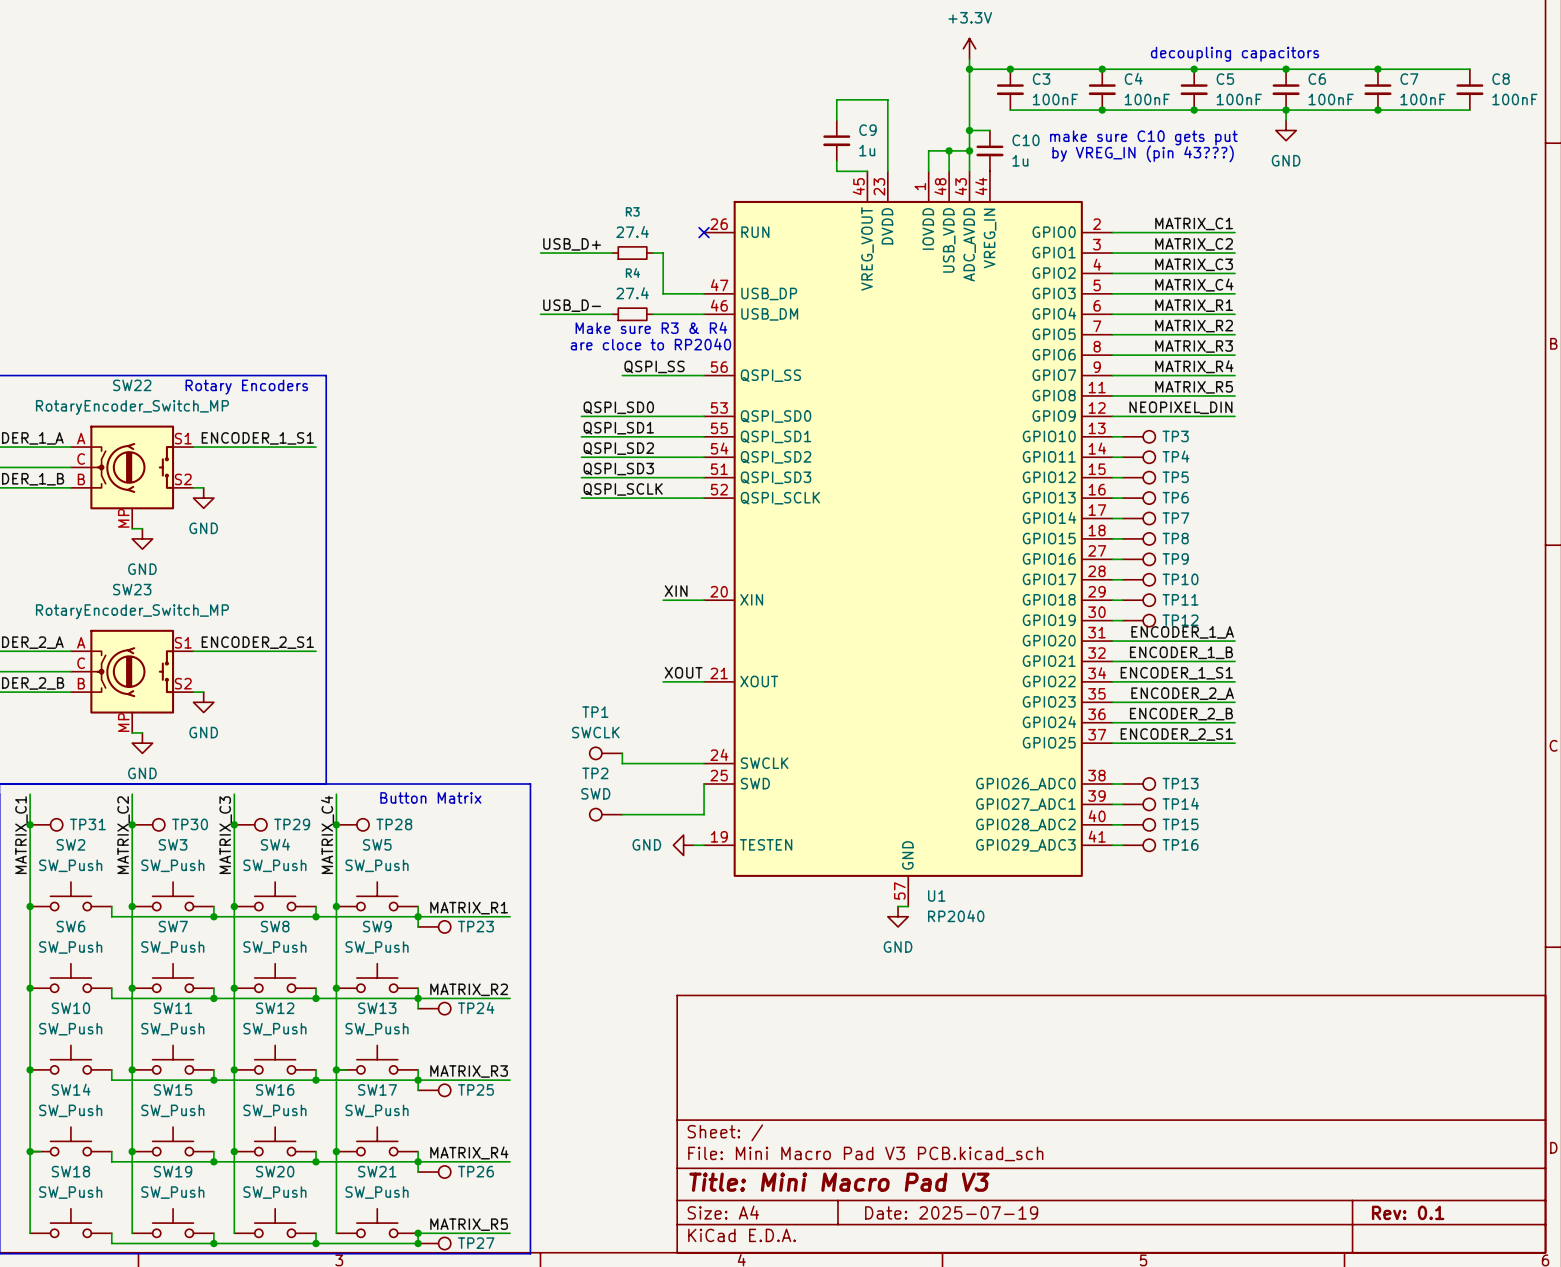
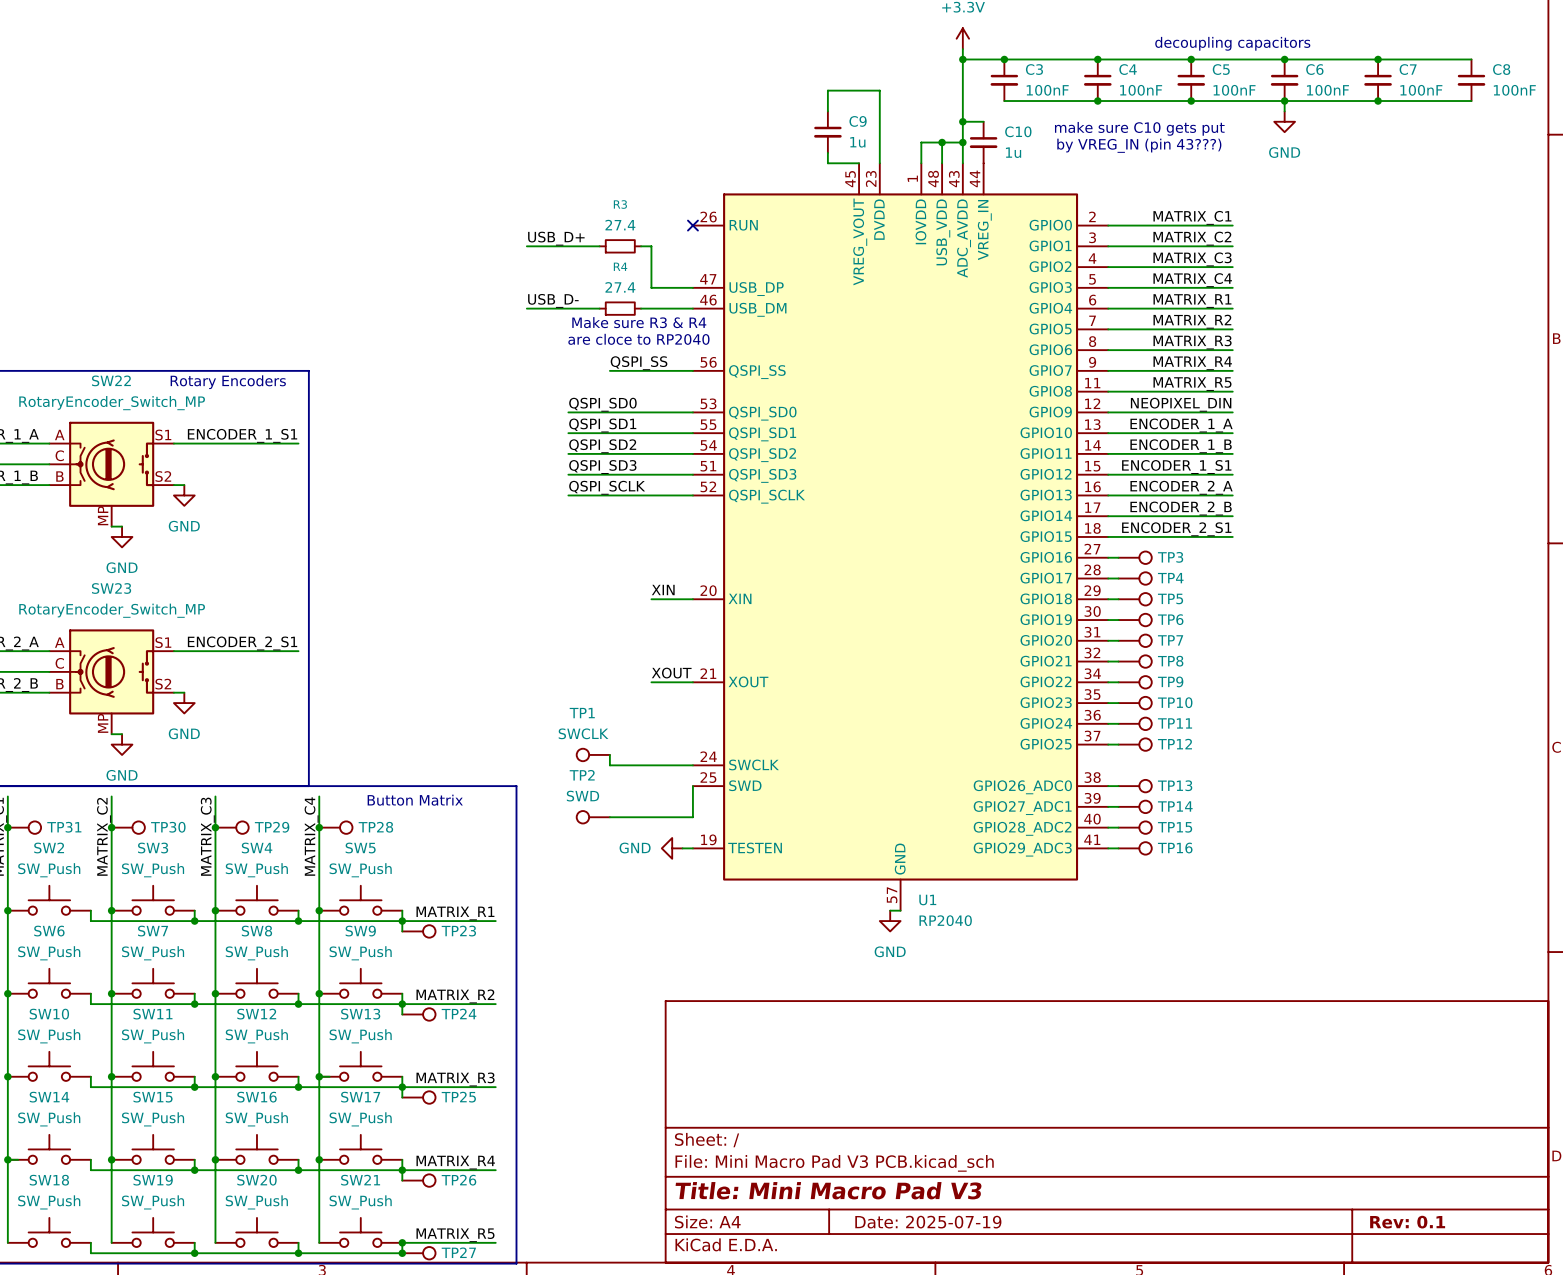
label: none -> ENCODER_1_A (1181, 425)
wire: none -> (1118, 433) (1232, 433)
TP3: (1139, 436) -> none
label: none -> ENCODER_1_B (1181, 446)
TP4: (1139, 457) -> none
label: none -> ENCODER_1_S1 (1176, 467)
TP5: (1139, 477) -> none
label: none -> ENCODER_2_A (1181, 487)
TP6: (1139, 498) -> none
label: none -> ENCODER_2_B (1181, 508)
TP7 position: (1139, 518) -> (1135, 640)
label: none -> ENCODER_2_S1 (1176, 529)
TP8 position: (1139, 538) -> (1135, 661)
TP9 name: TP9 (1175, 558) -> TP3 (1170, 557)
TP10 name: TP10 (1180, 579) -> TP4 (1170, 578)
TP11 name: TP11 (1180, 599) -> TP5 (1170, 598)
TP12 name: TP12 (1180, 620) -> TP6 (1170, 619)
label: ENCODER_1_A (1182, 632) -> none
wire: (1122, 641) (1235, 641) -> (1118, 453) (1232, 453)
label: ENCODER_1_B (1181, 652) -> none
wire: (1122, 661) (1235, 661) -> (1118, 474) (1232, 474)
label: ENCODER_1_S1 (1176, 673) -> none
wire: (1122, 681) (1235, 681) -> (1118, 495) (1232, 495)
TP9: none -> (1135, 682)
label: ENCODER_2_A (1182, 693) -> none
wire: (1122, 702) (1235, 702) -> (1118, 516) (1232, 516)
TP10: none -> (1135, 703)
label: ENCODER_2_B (1181, 714) -> none
wire: (1122, 722) (1235, 722) -> (1118, 536) (1232, 536)
TP11: none -> (1135, 723)
label: ENCODER_2_S1 (1176, 734) -> none
wire: (1122, 743) (1235, 743) -> none
TP12: none -> (1135, 744)

